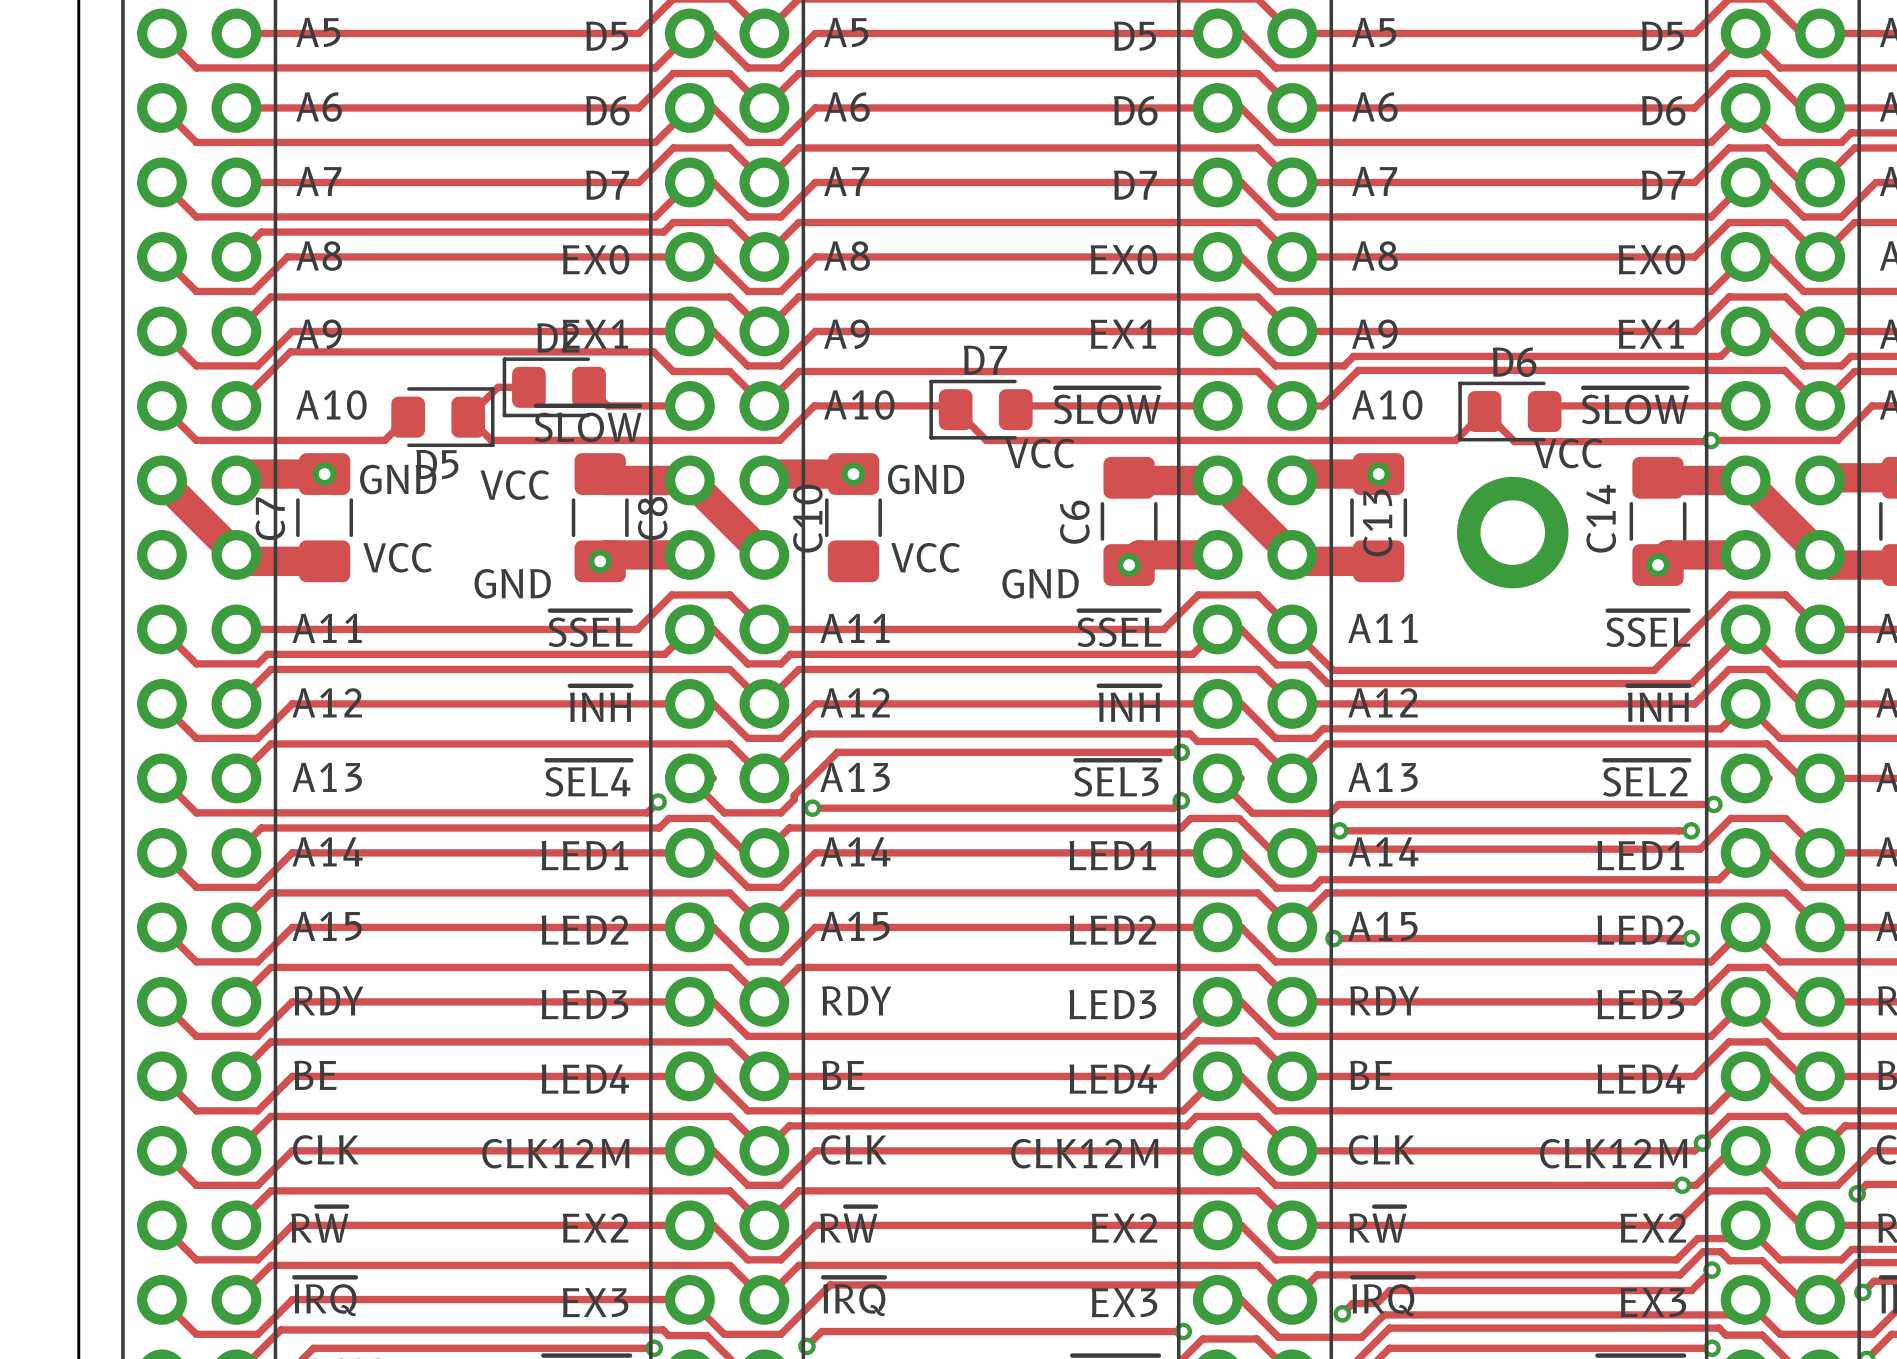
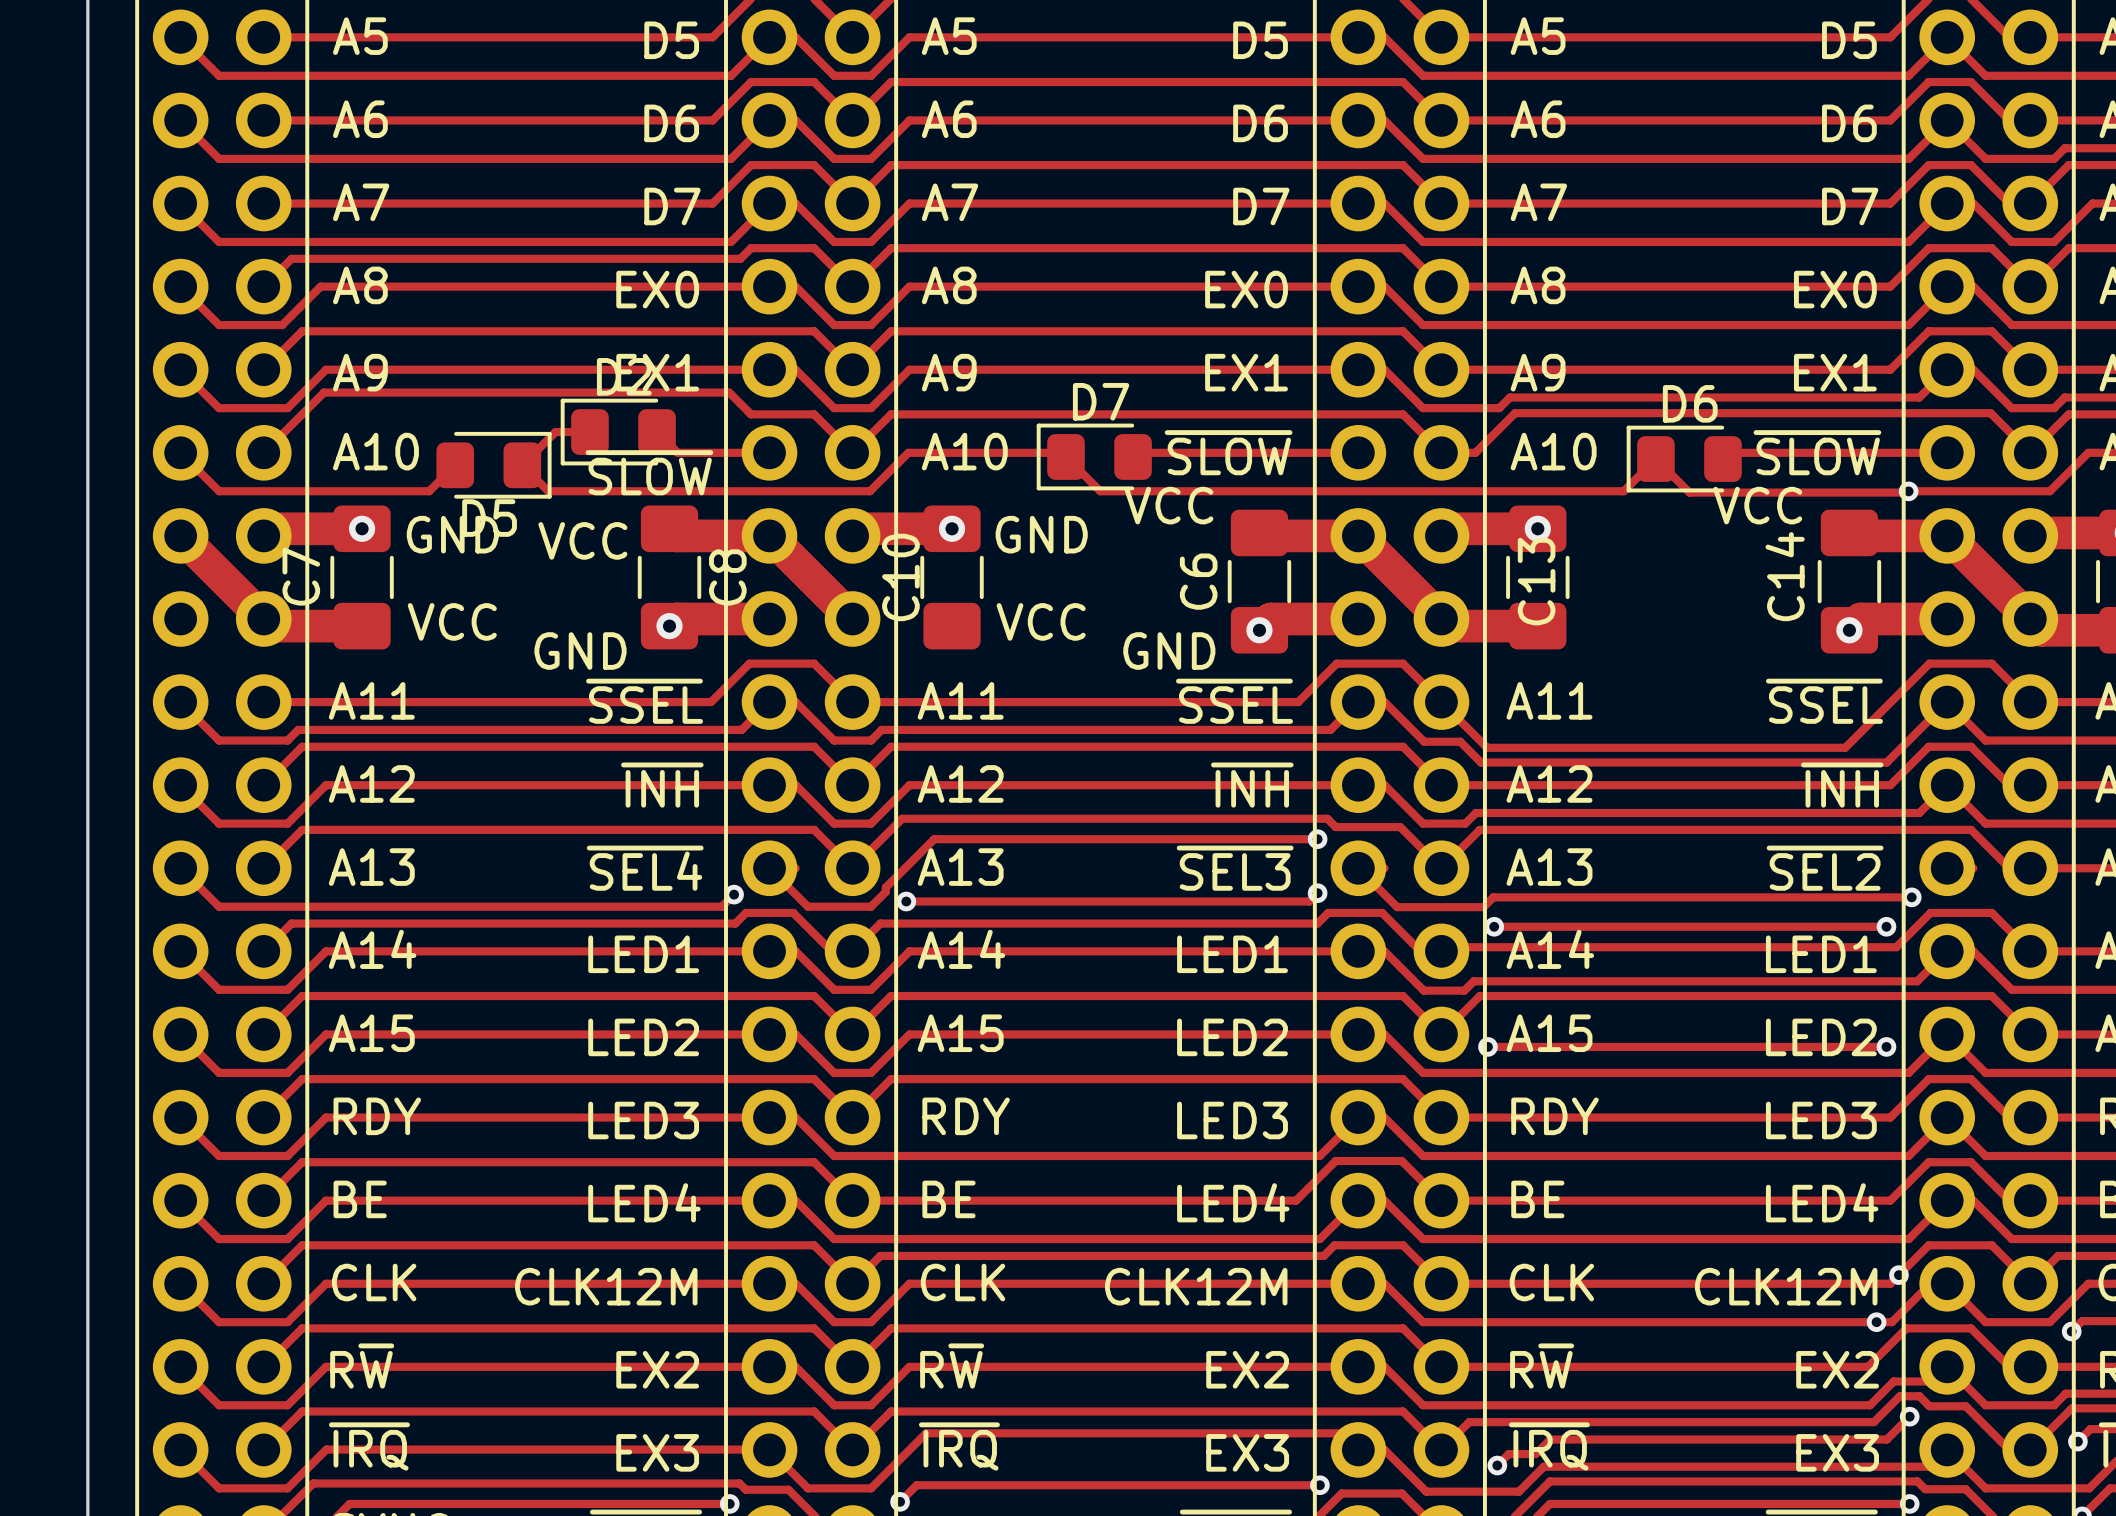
part: (1512, 532) -> none

